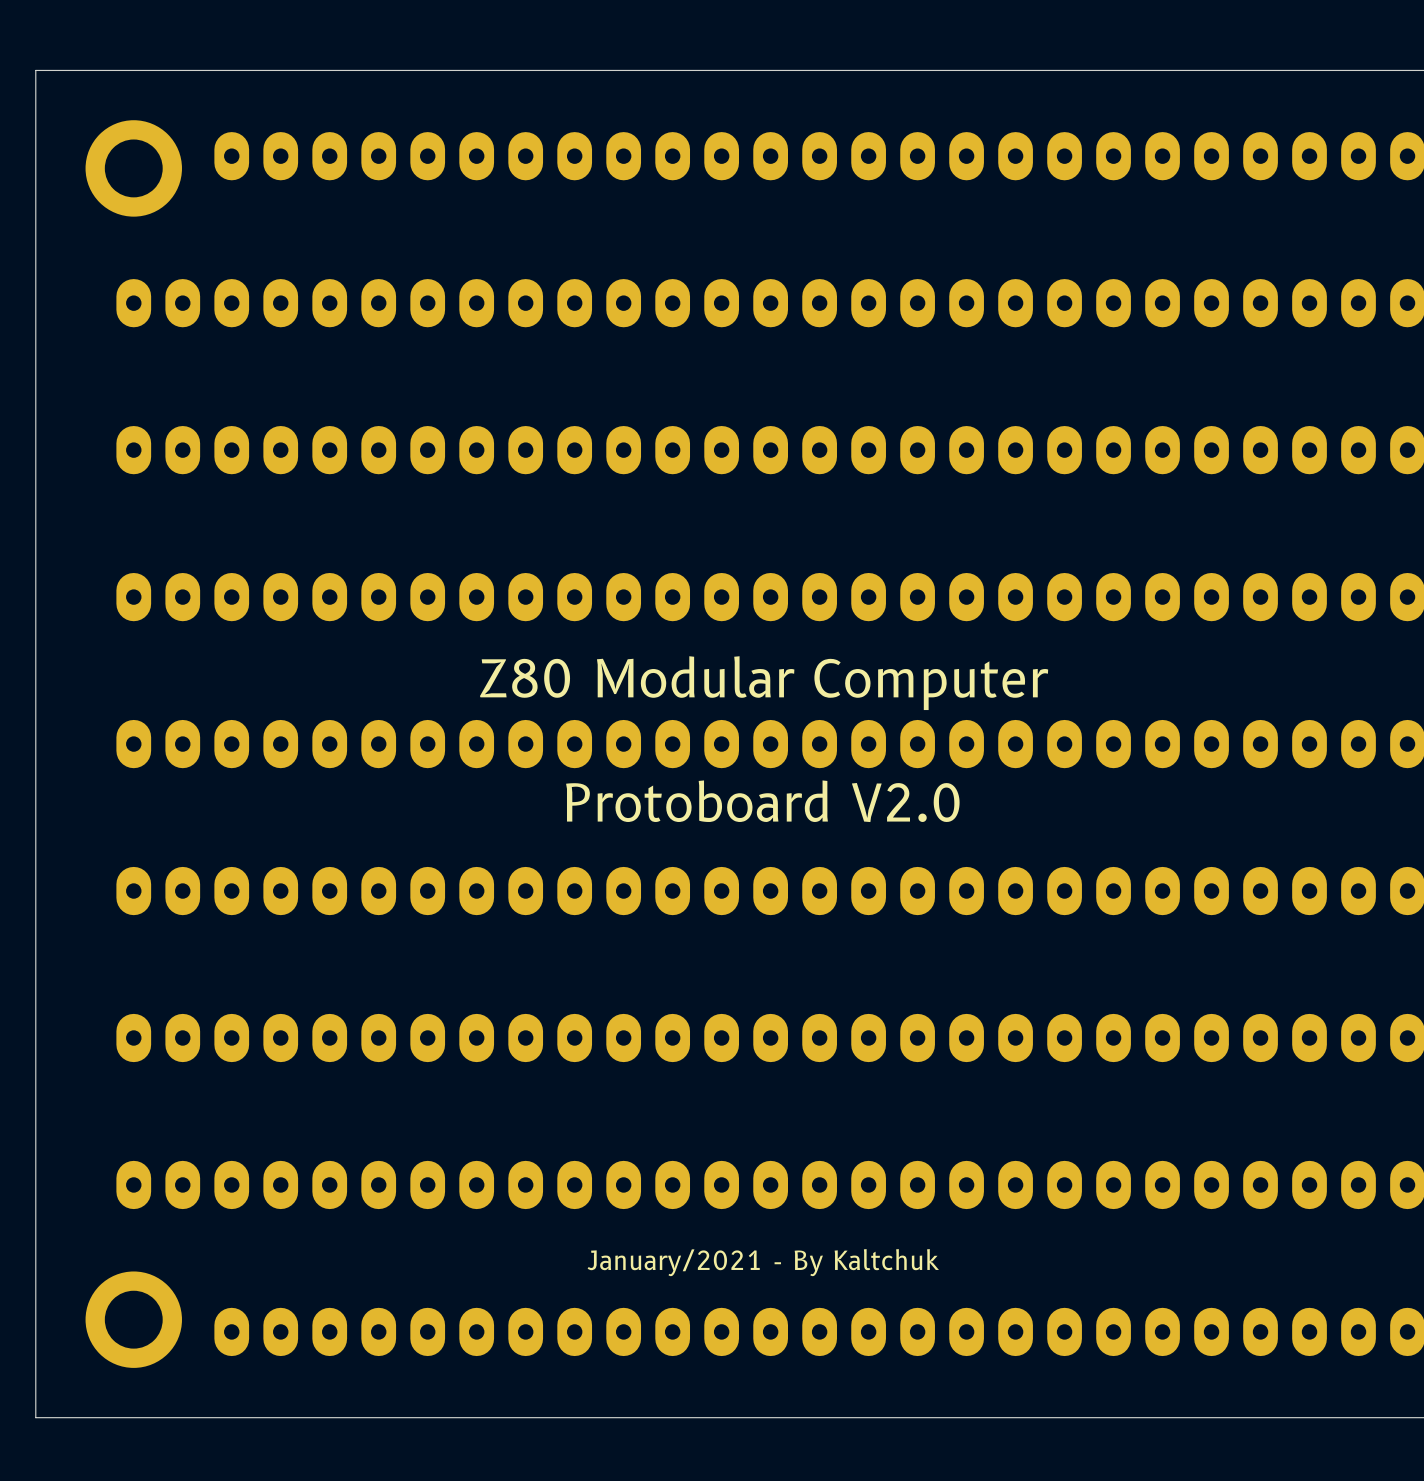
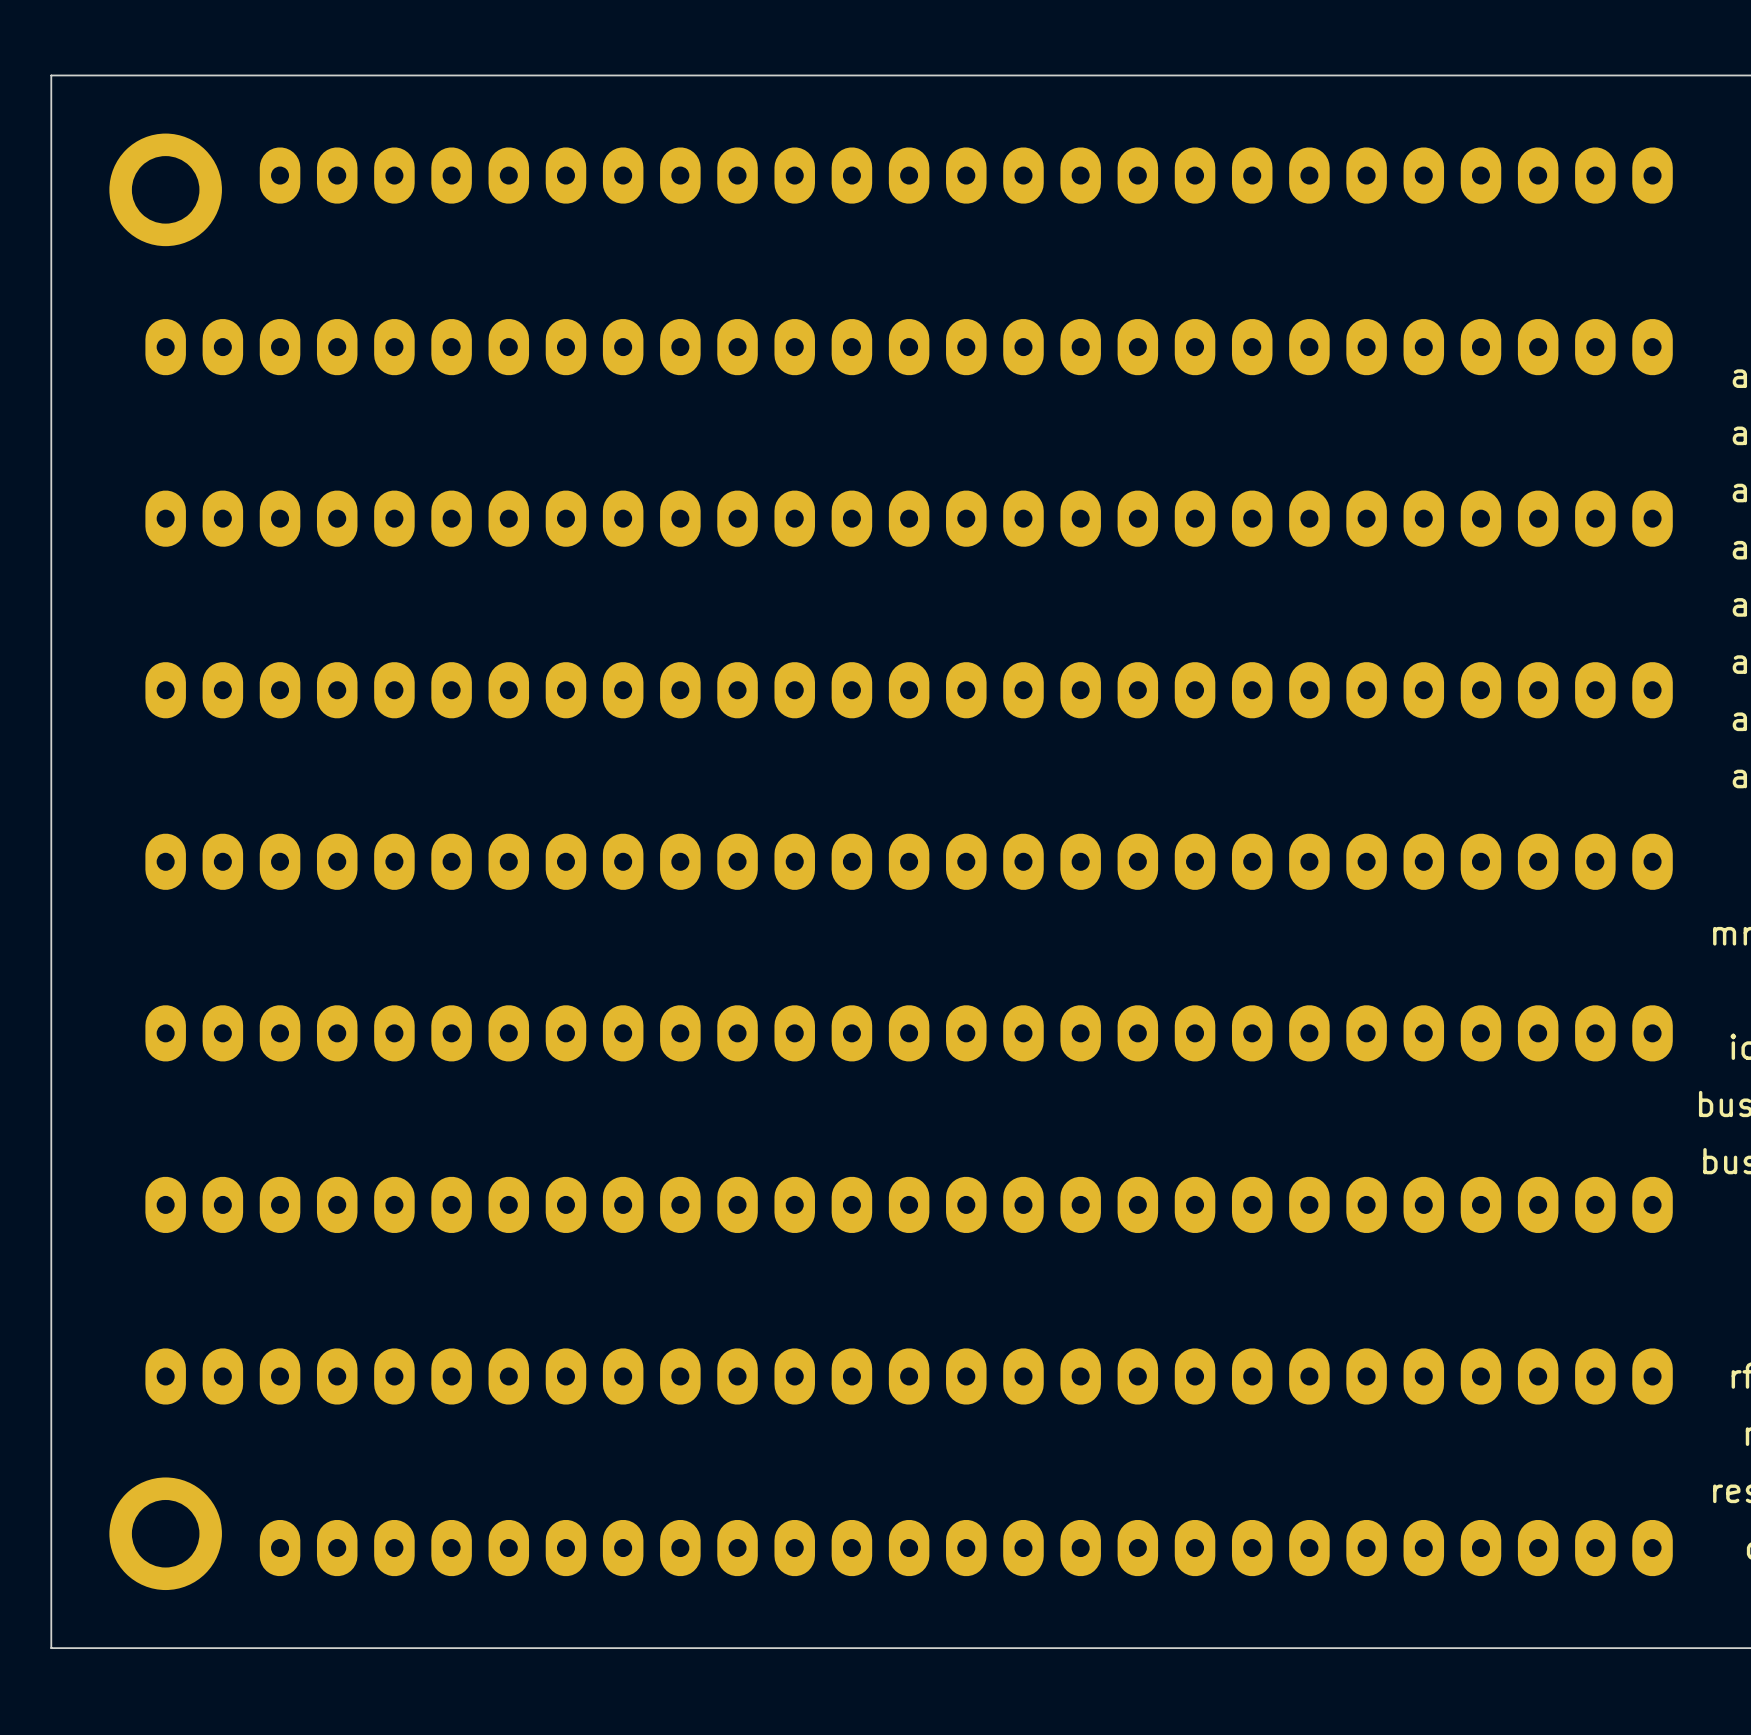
text: Z80 Modular Computer (764, 683) -> none
text: Protoboard V2.0 (762, 801) -> none
text: January/2021 - By Kaltchuk (763, 1262) -> none

